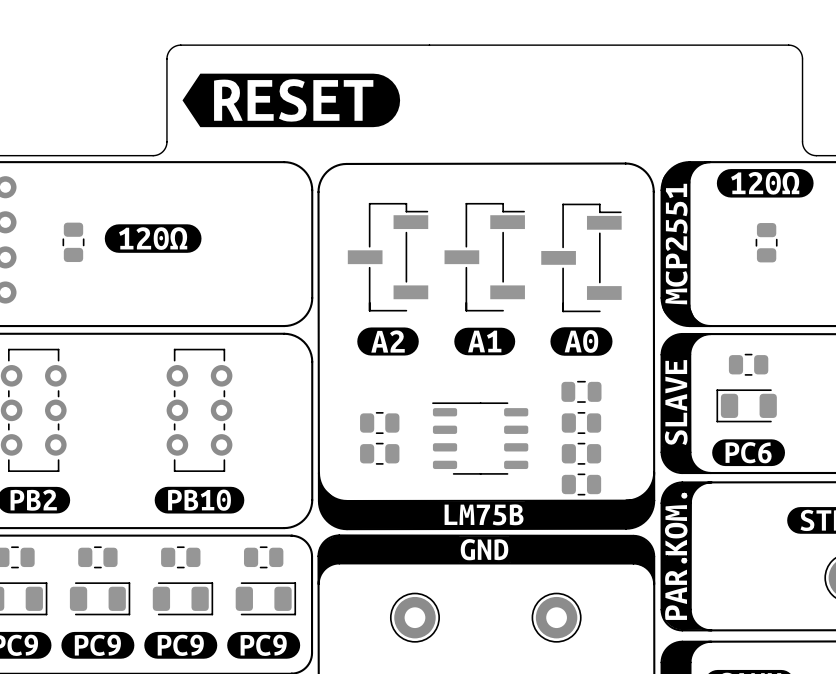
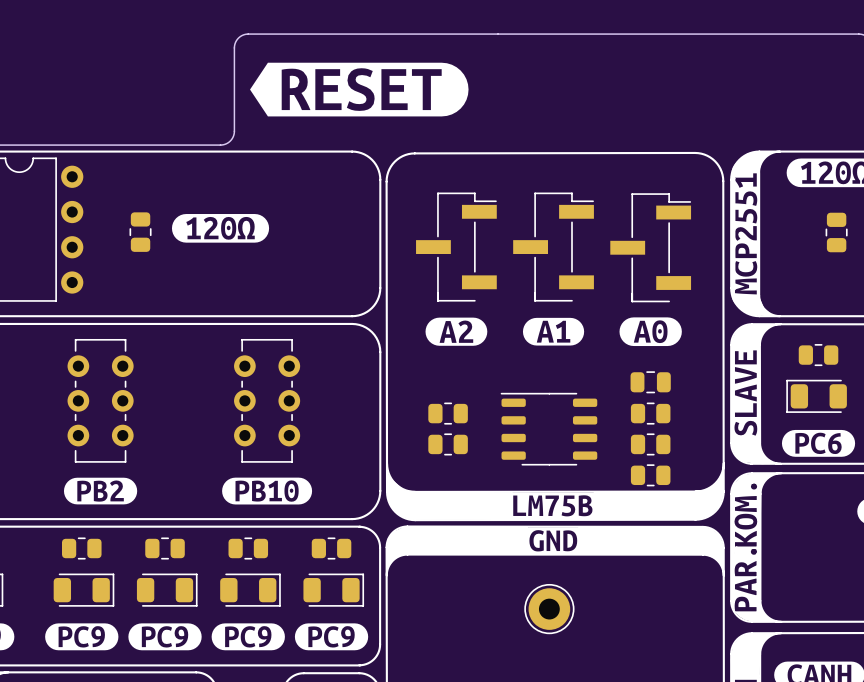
part: (414, 617) -> none
part: none -> (549, 609)
part: (556, 617) -> none

